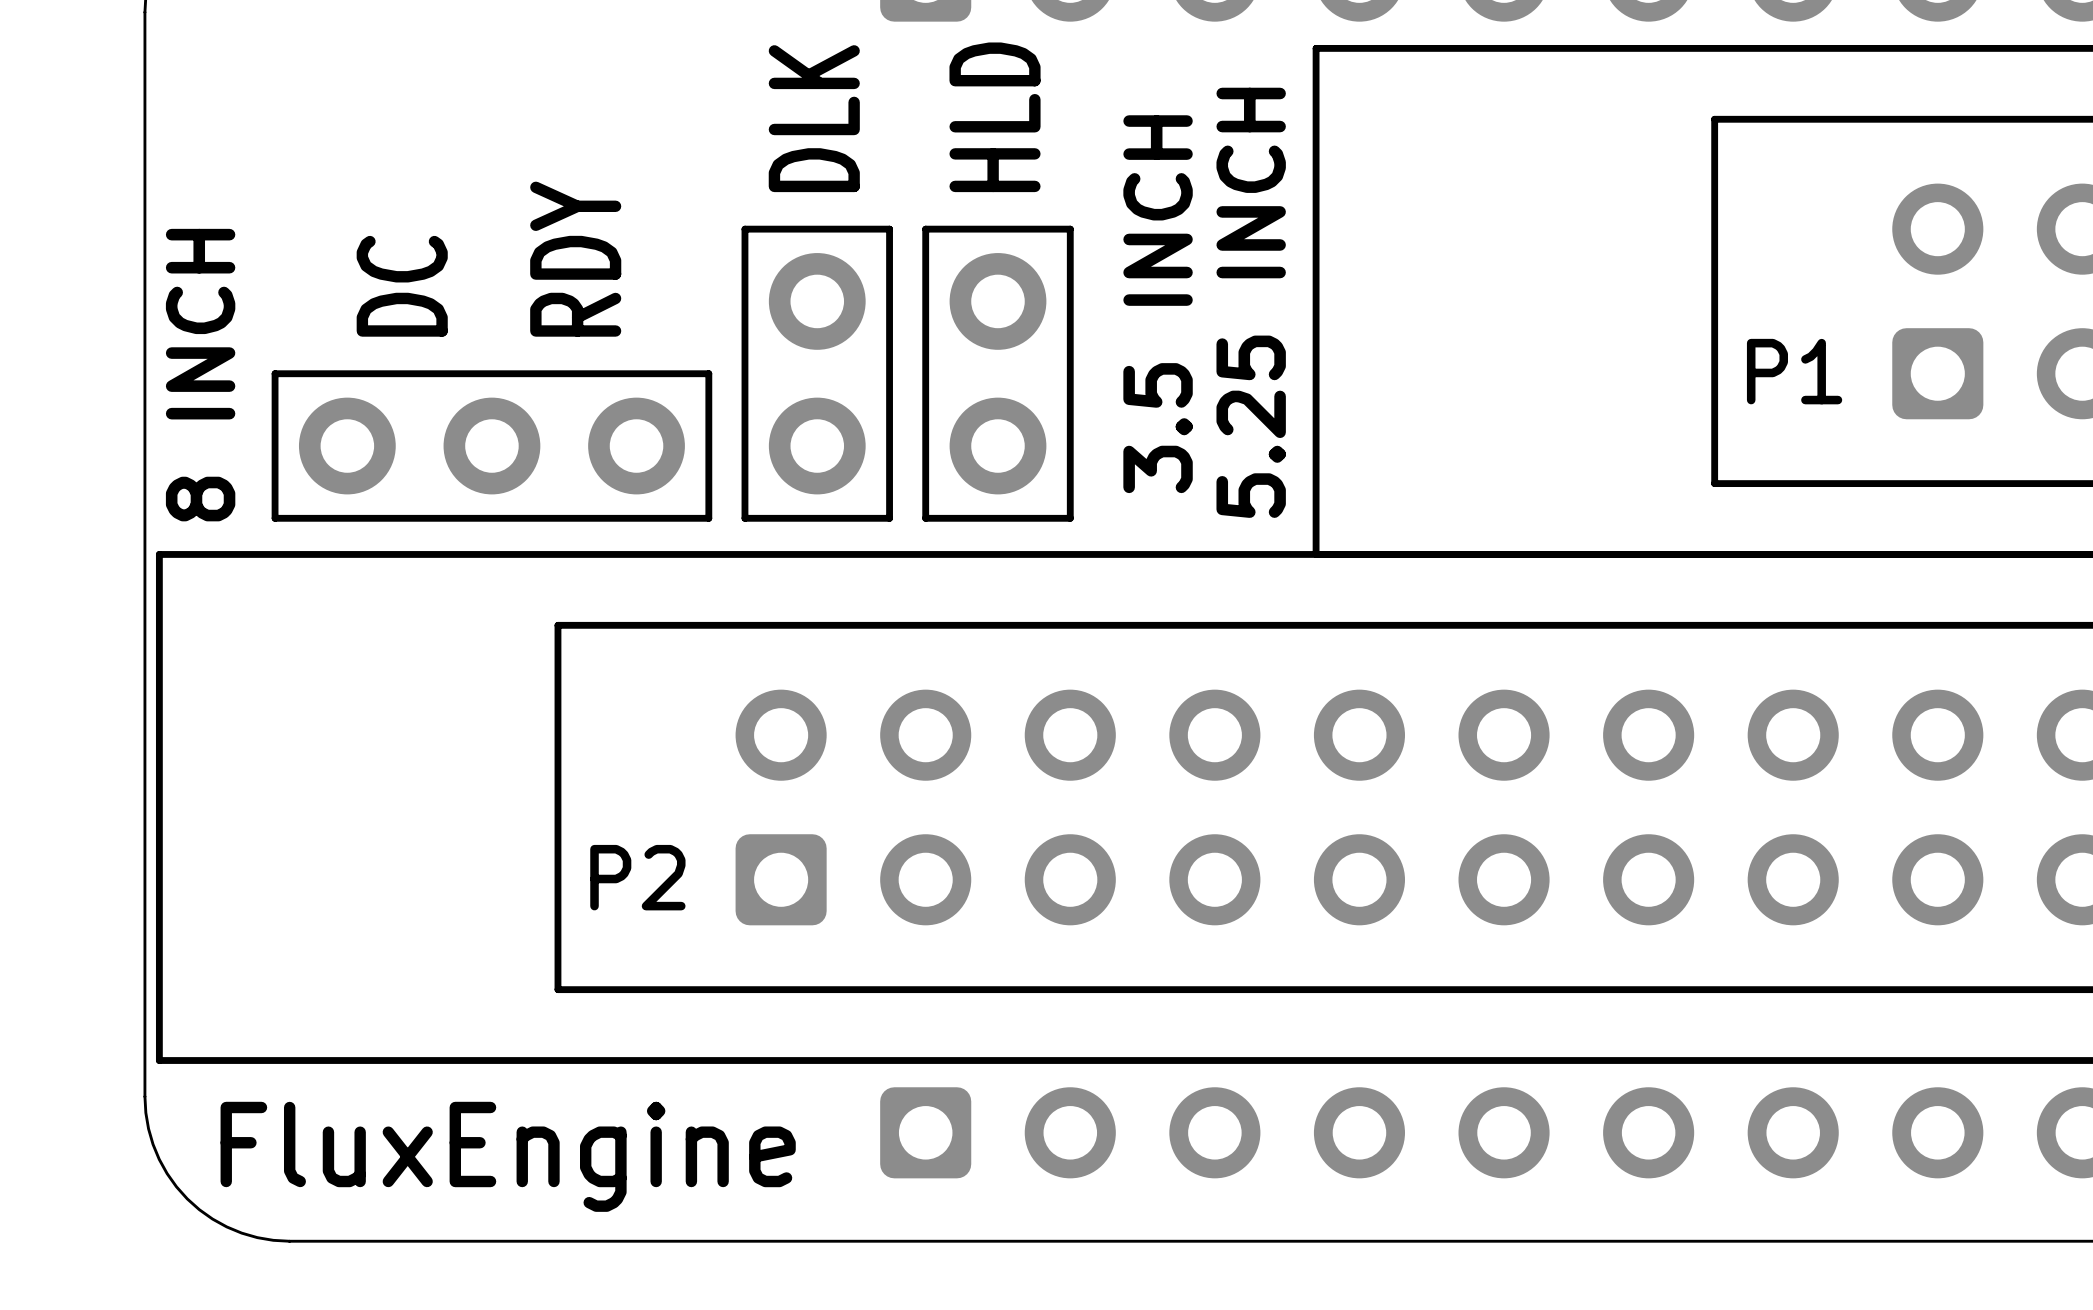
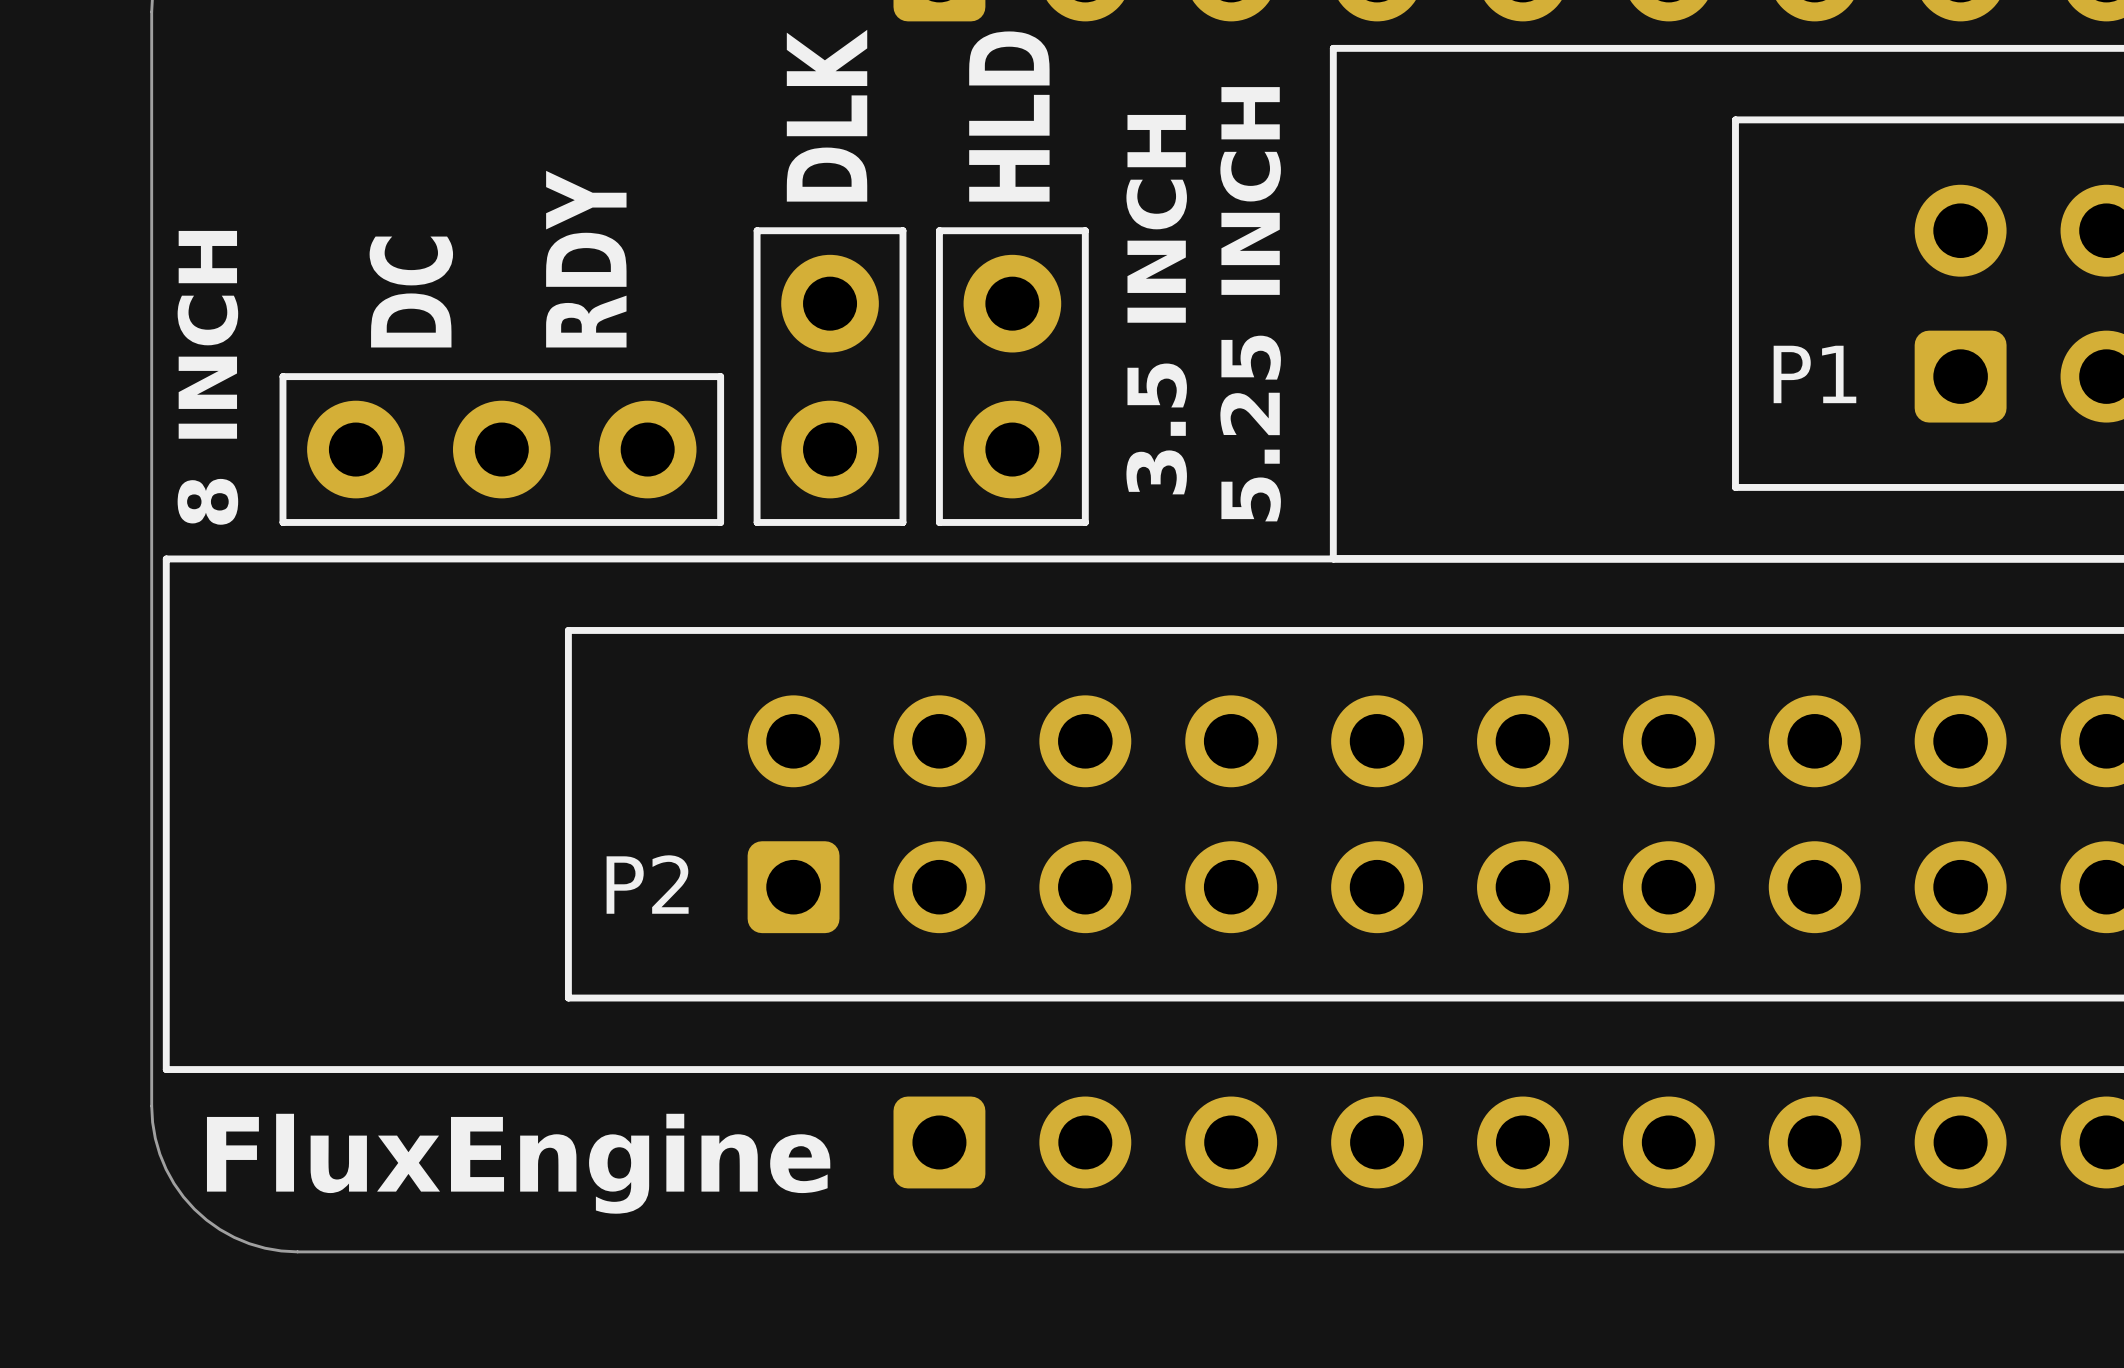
text position: 5.25 INCH (1251, 302) -> 5.25 INCH (1250, 304)
text position: 3.5 INCH (1158, 304) -> 3.5 INCH (1156, 304)

